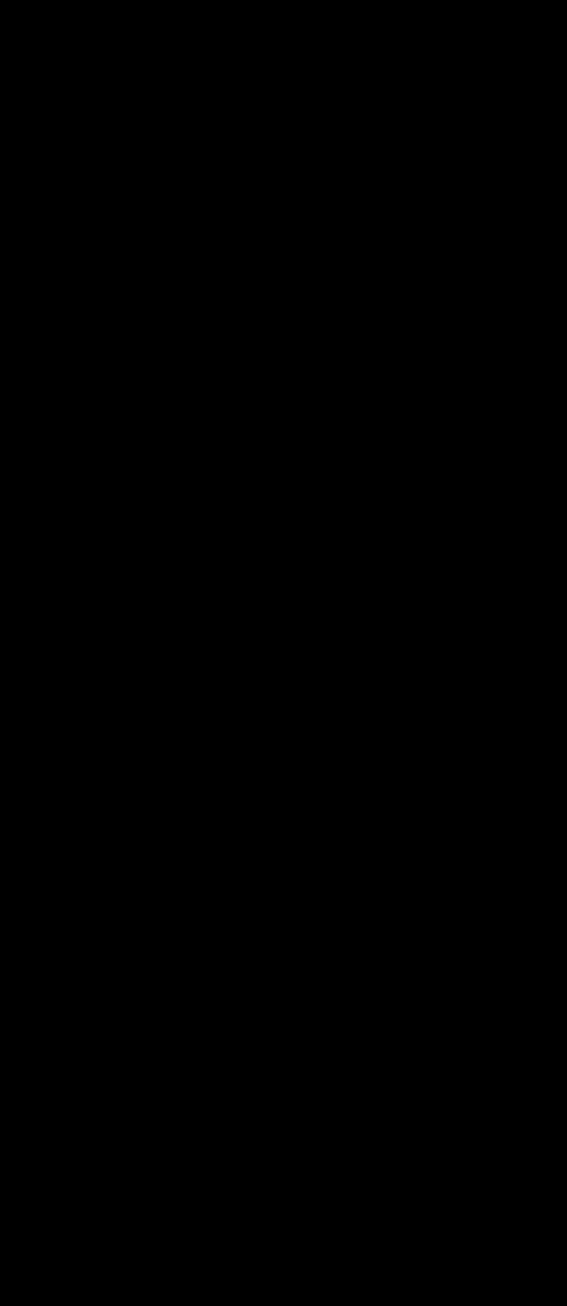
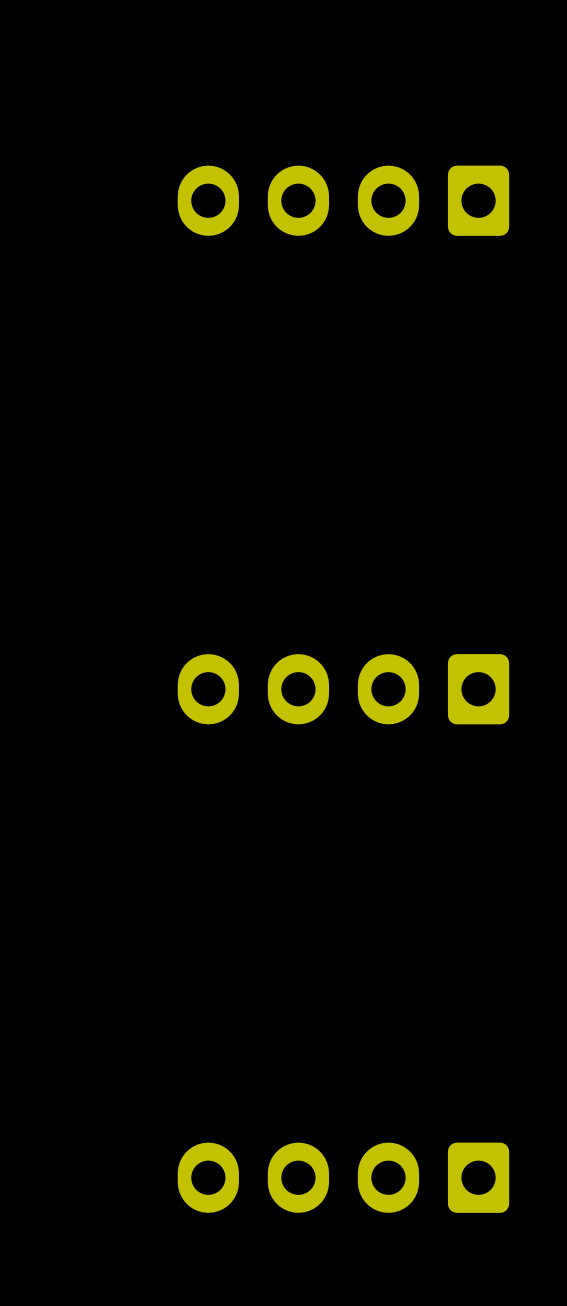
part: none -> (343, 200)
part: none -> (343, 689)
part: none -> (343, 1177)

